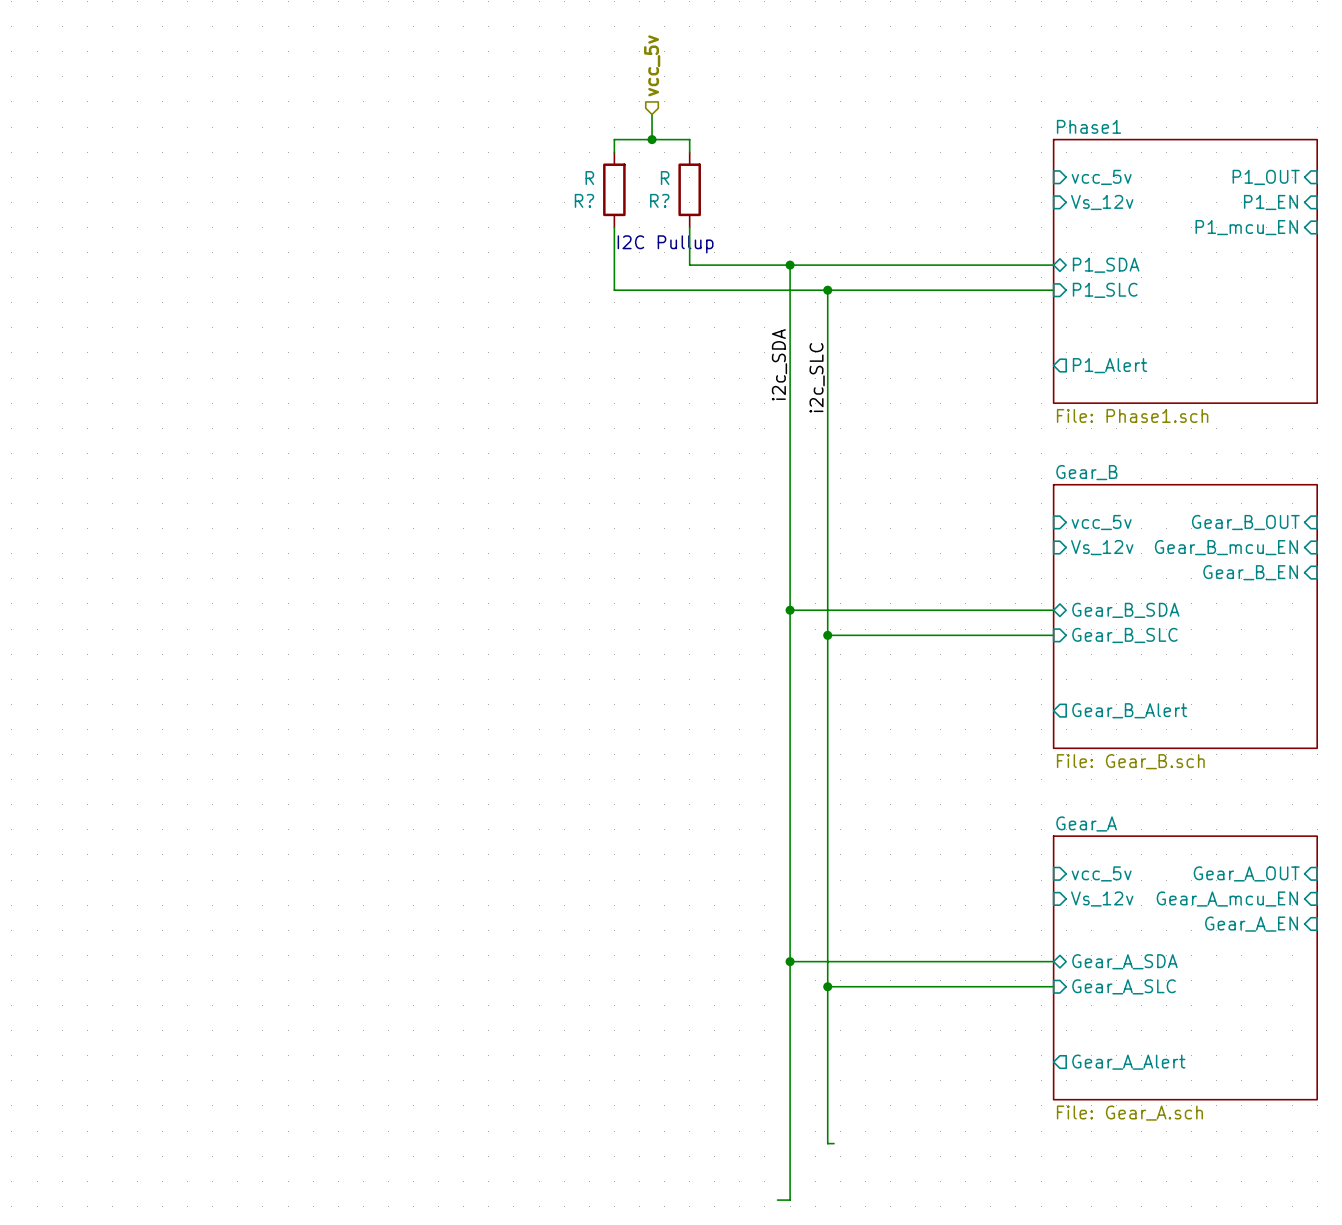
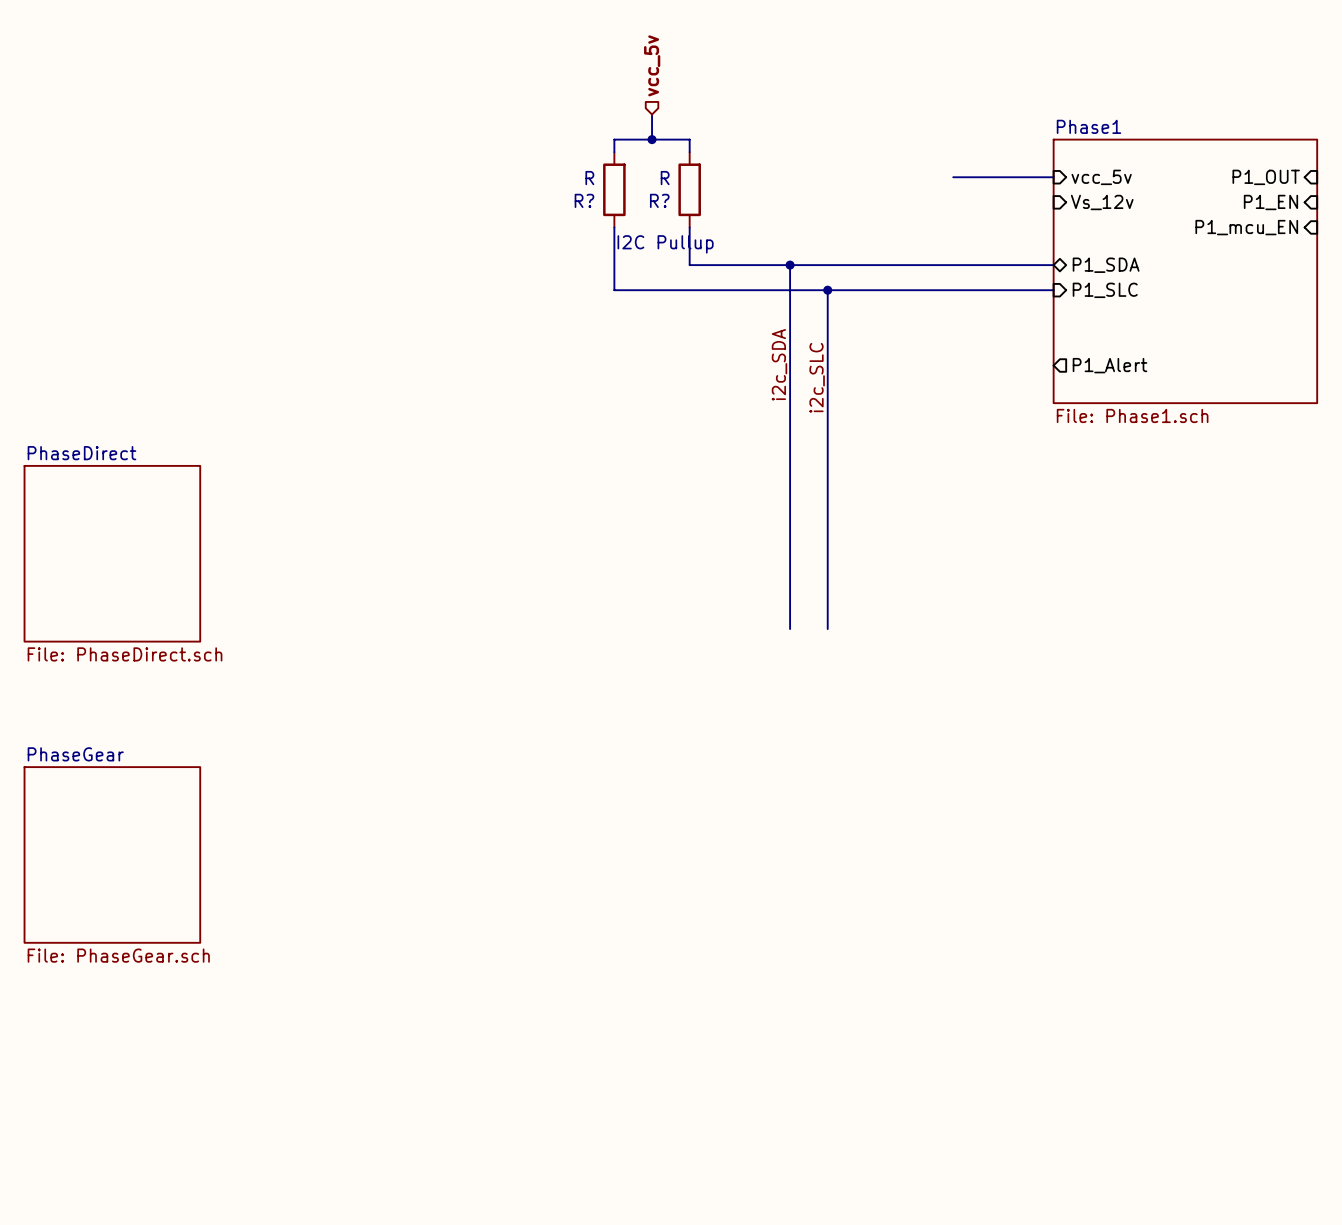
wire: none -> (953, 177) (1053, 177)
sheet pin: vcc_5v (1101, 522) -> none
sheet pin: Gear_B_OUT (1245, 522) -> none
sheet pin: Vs_12v (1102, 547) -> none
sheet pin: Gear_B_mcu_EN (1226, 547) -> none
sheet PhaseDirect: none -> File: PhaseDirect.sch (112, 553)
sheet pin: Gear_B_EN (1250, 572) -> none
wire: (790, 610) (1053, 610) -> none
junction: (790, 610) -> none
sheet pin: Gear_B_SDA (1125, 610) -> none
sheet Gear_B: File: Gear_B.sch (1185, 616) -> none
wire: (790, 629) (790, 1200) (777, 1200) -> none
wire: (827, 629) (827, 1143) (834, 1143) -> none
wire: (827, 635) (1053, 635) -> none
junction: (827, 635) -> none
sheet pin: Gear_B_SLC (1124, 635) -> none
sheet pin: Gear_B_Alert (1129, 710) -> none
sheet PhaseGear: none -> File: PhaseGear.sch (112, 854)
sheet pin: vcc_5v (1101, 873) -> none
sheet pin: Gear_A_OUT (1246, 873) -> none
sheet pin: Vs_12v (1102, 899) -> none
sheet pin: Gear_A_mcu_EN (1227, 899) -> none
sheet pin: Gear_A_EN (1251, 924) -> none
wire: (790, 961) (1053, 961) -> none
junction: (790, 961) -> none
sheet pin: Gear_A_SDA (1124, 961) -> none
sheet Gear_A: File: Gear_A.sch (1185, 967) -> none
wire: (827, 986) (1053, 986) -> none
junction: (827, 986) -> none
sheet pin: Gear_A_SLC (1124, 986) -> none
sheet pin: Gear_A_Alert (1128, 1062) -> none

